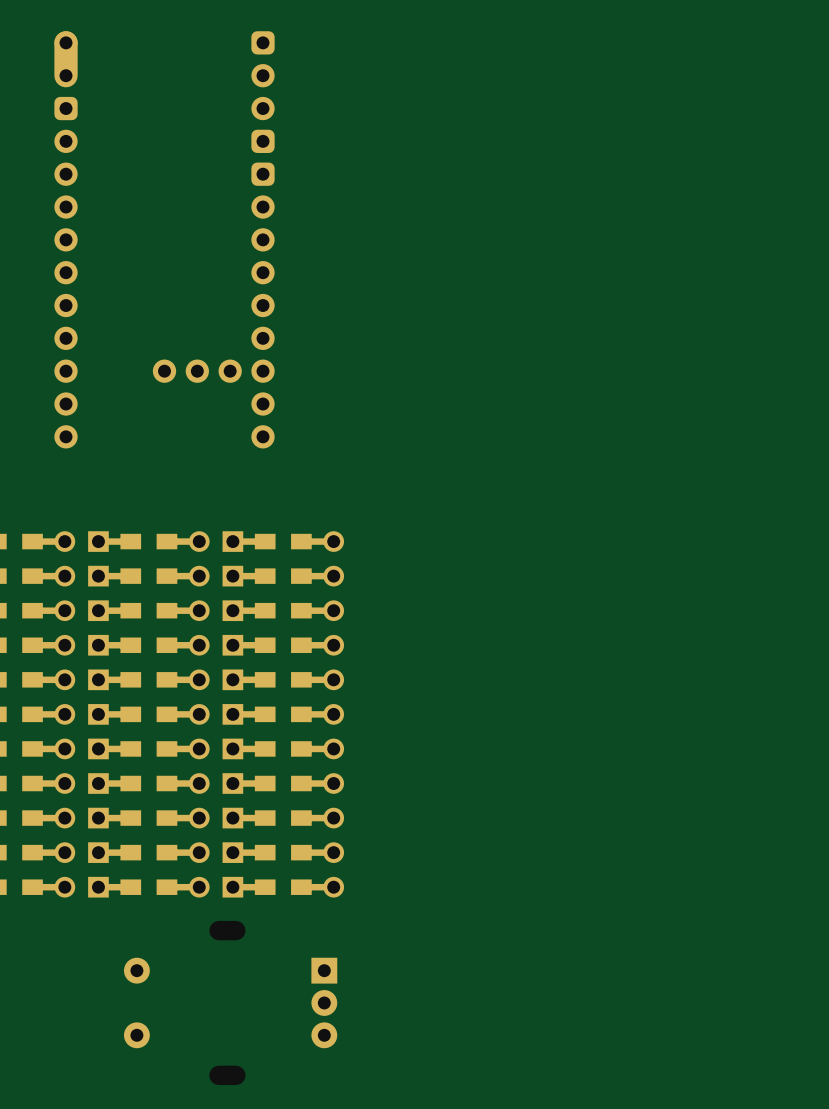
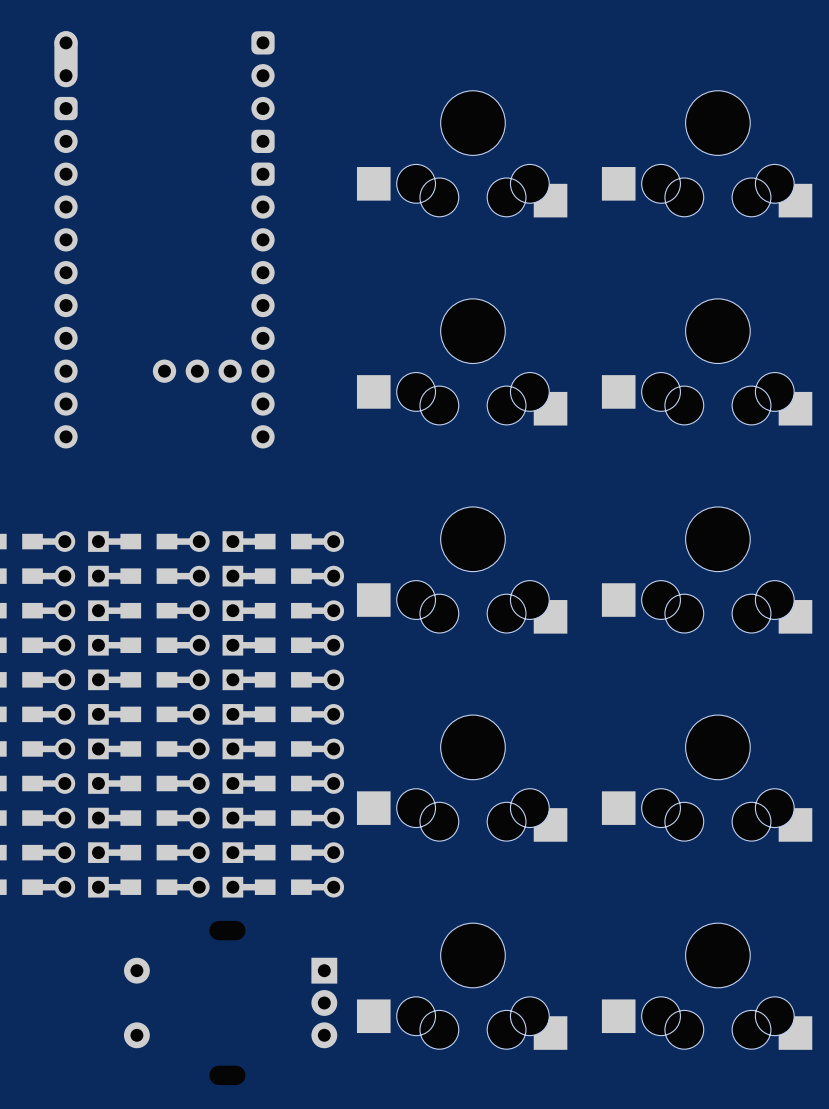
part: none -> (462, 154)
part: none -> (707, 154)
part: none -> (462, 362)
part: none -> (707, 362)
part: none -> (462, 570)
part: none -> (707, 570)
part: none -> (462, 778)
part: none -> (707, 778)
part: none -> (462, 986)
part: none -> (707, 986)

